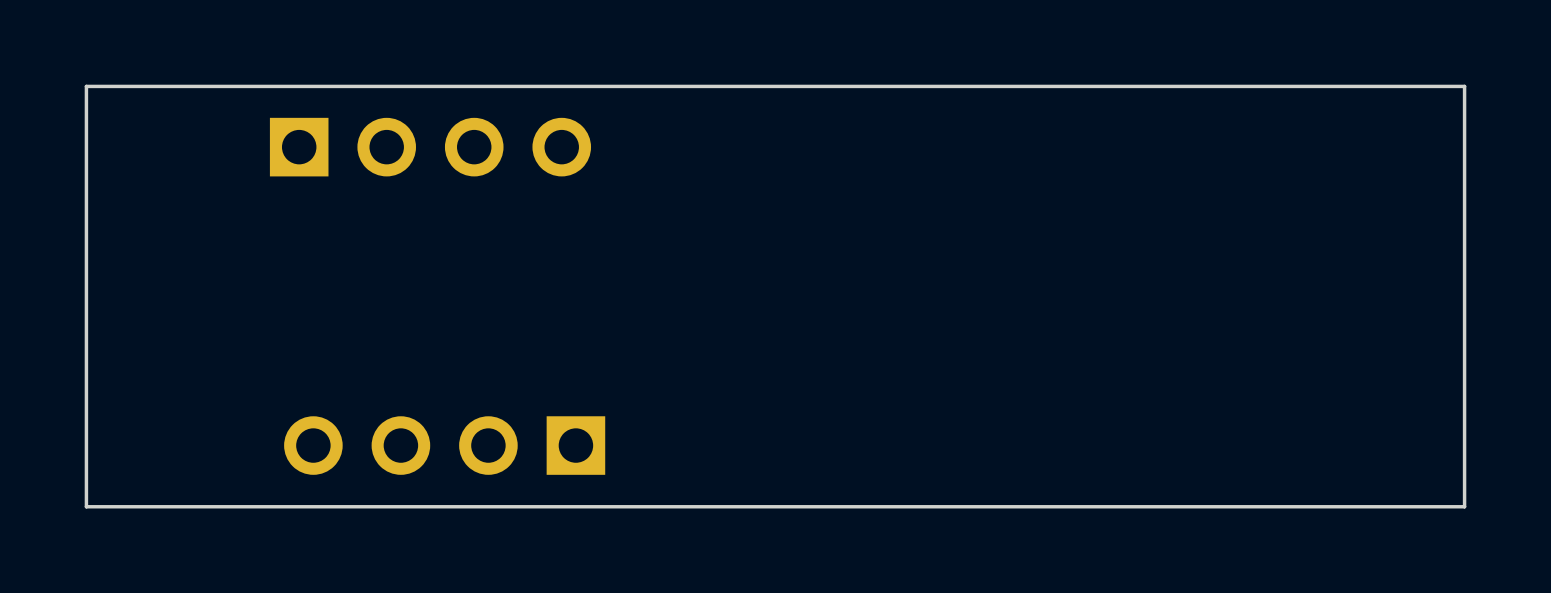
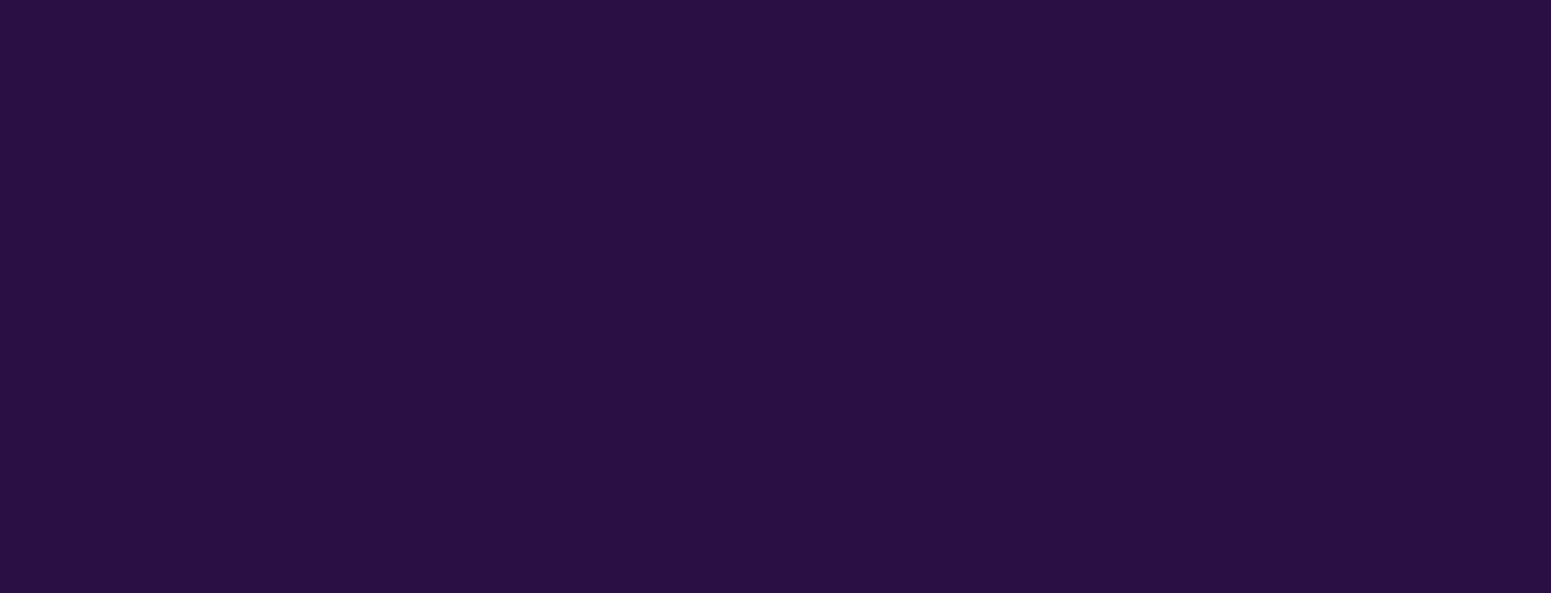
board edge: (1464, 86) (86, 86) (86, 506) (1464, 506) (1464, 86) -> none
part: (430, 147) -> none
part: (444, 445) -> none

